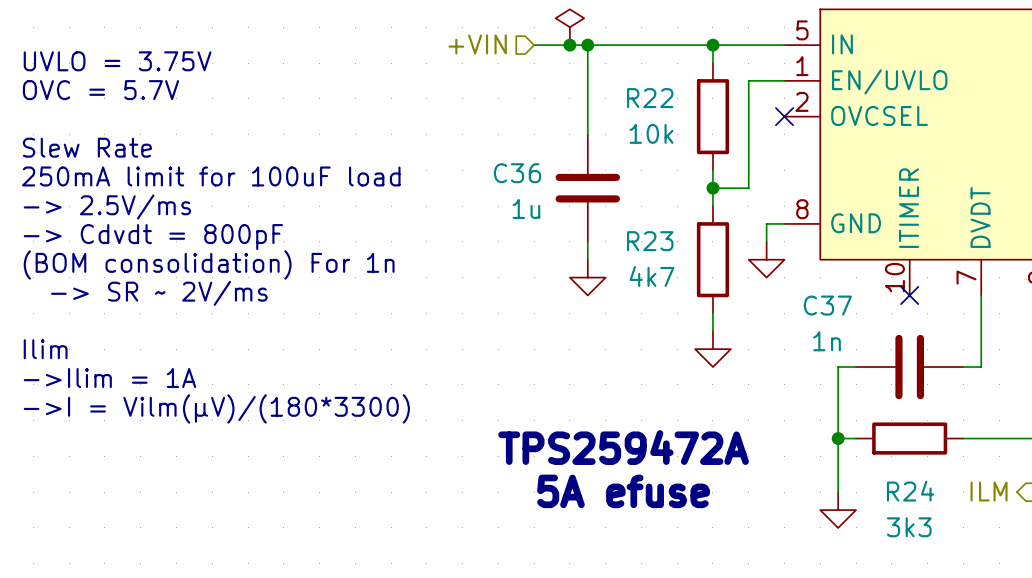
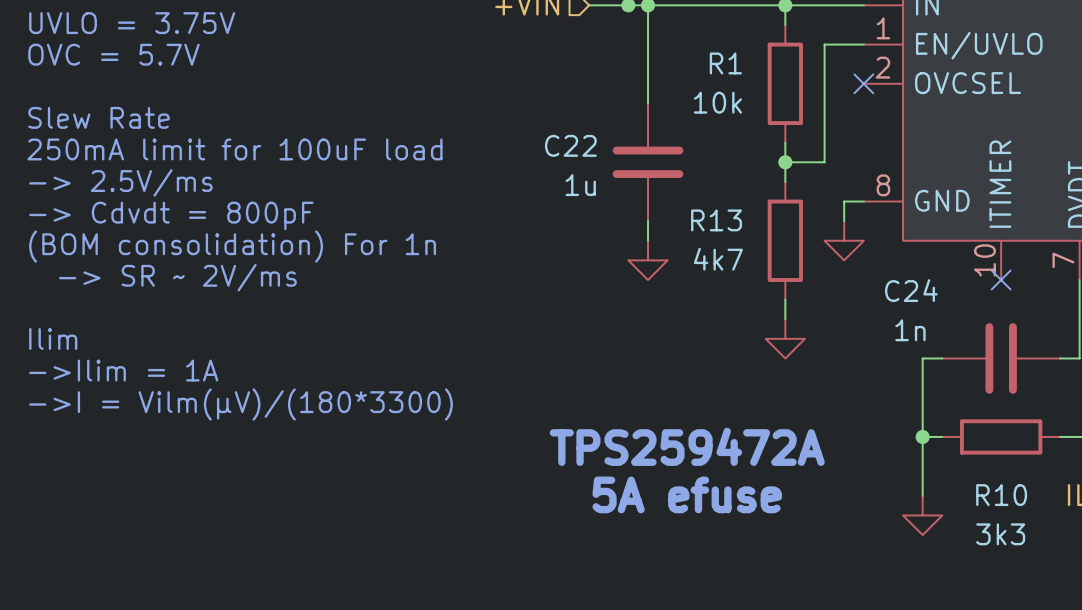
R22 name: R22 (650, 98) -> R1 (725, 63)
C36 name: C36 (517, 173) -> C22 (570, 145)
R23 name: R23 (650, 241) -> R13 (716, 220)
C37 name: C37 (827, 305) -> C24 (911, 290)
R24 name: R24 (910, 491) -> R10 (1001, 495)

